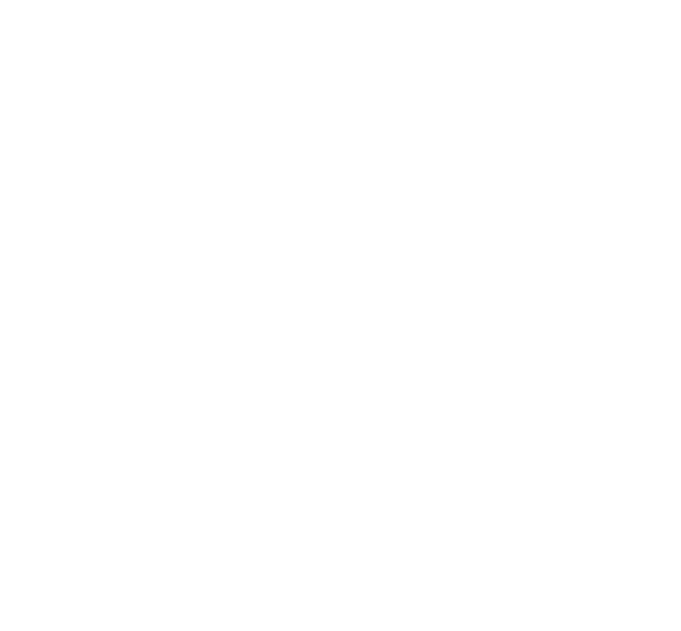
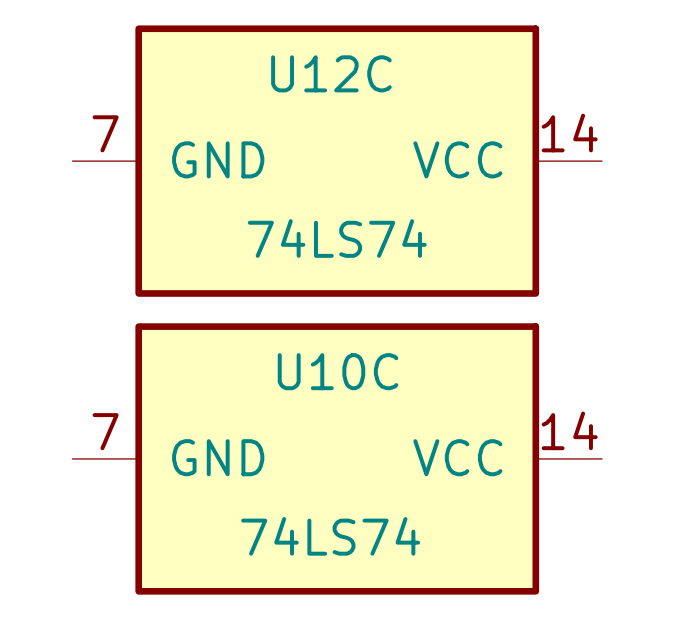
U12C: none -> 74LS74 (337, 161)
U10C: none -> 74LS74 (337, 458)

